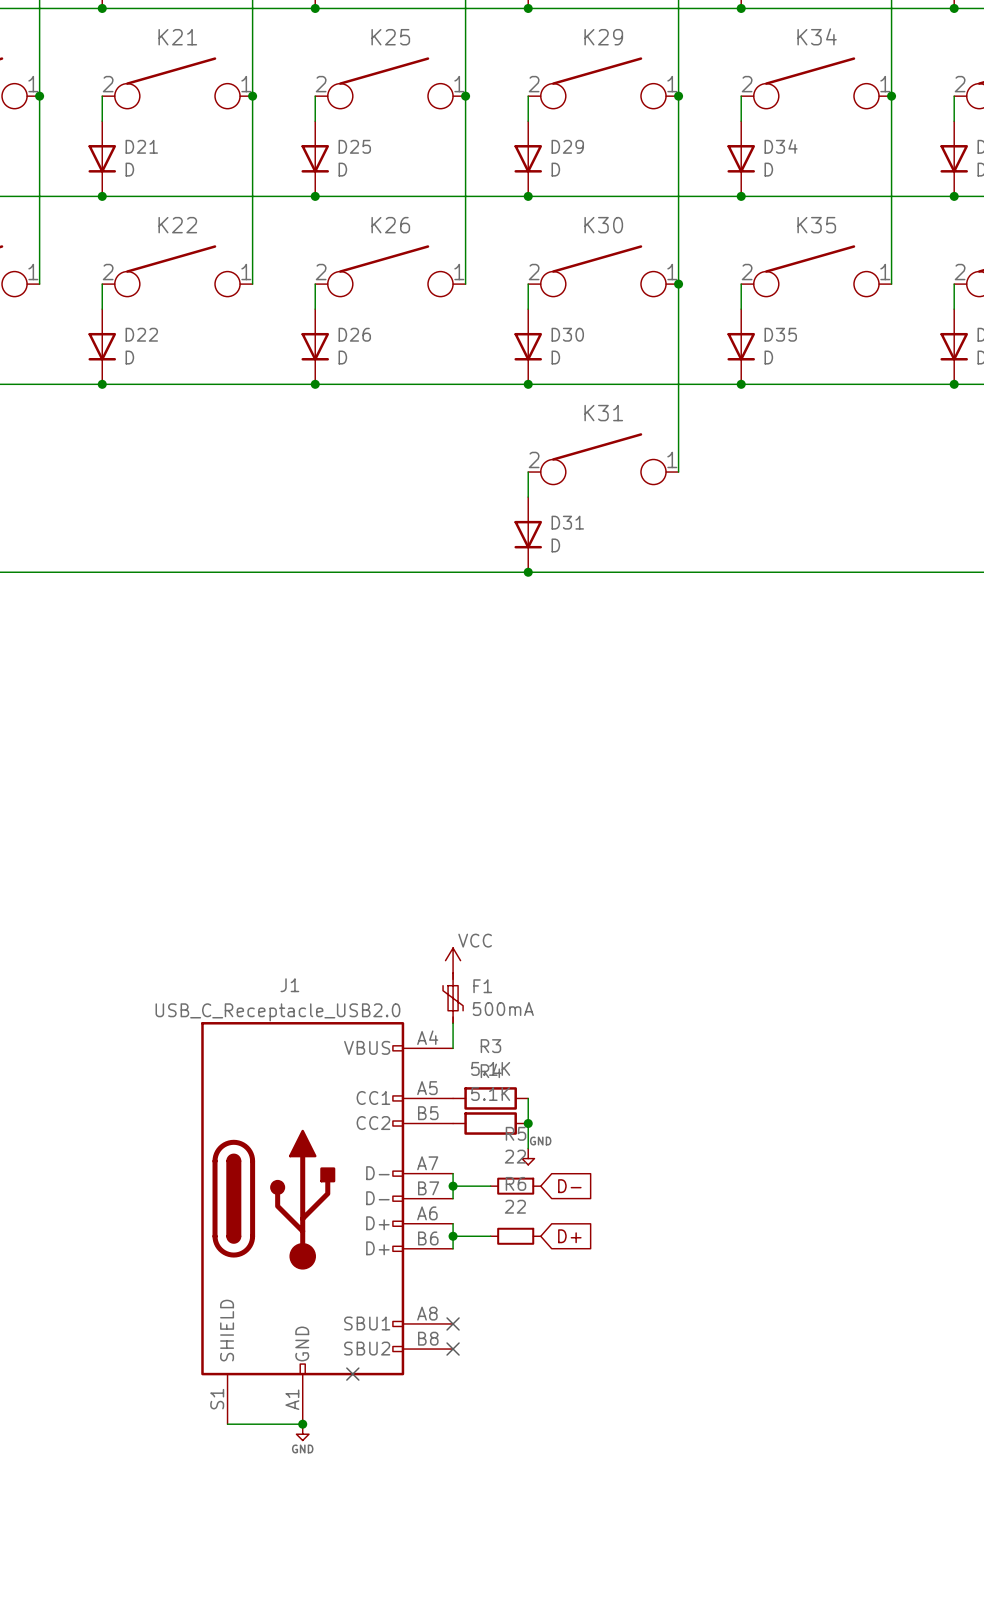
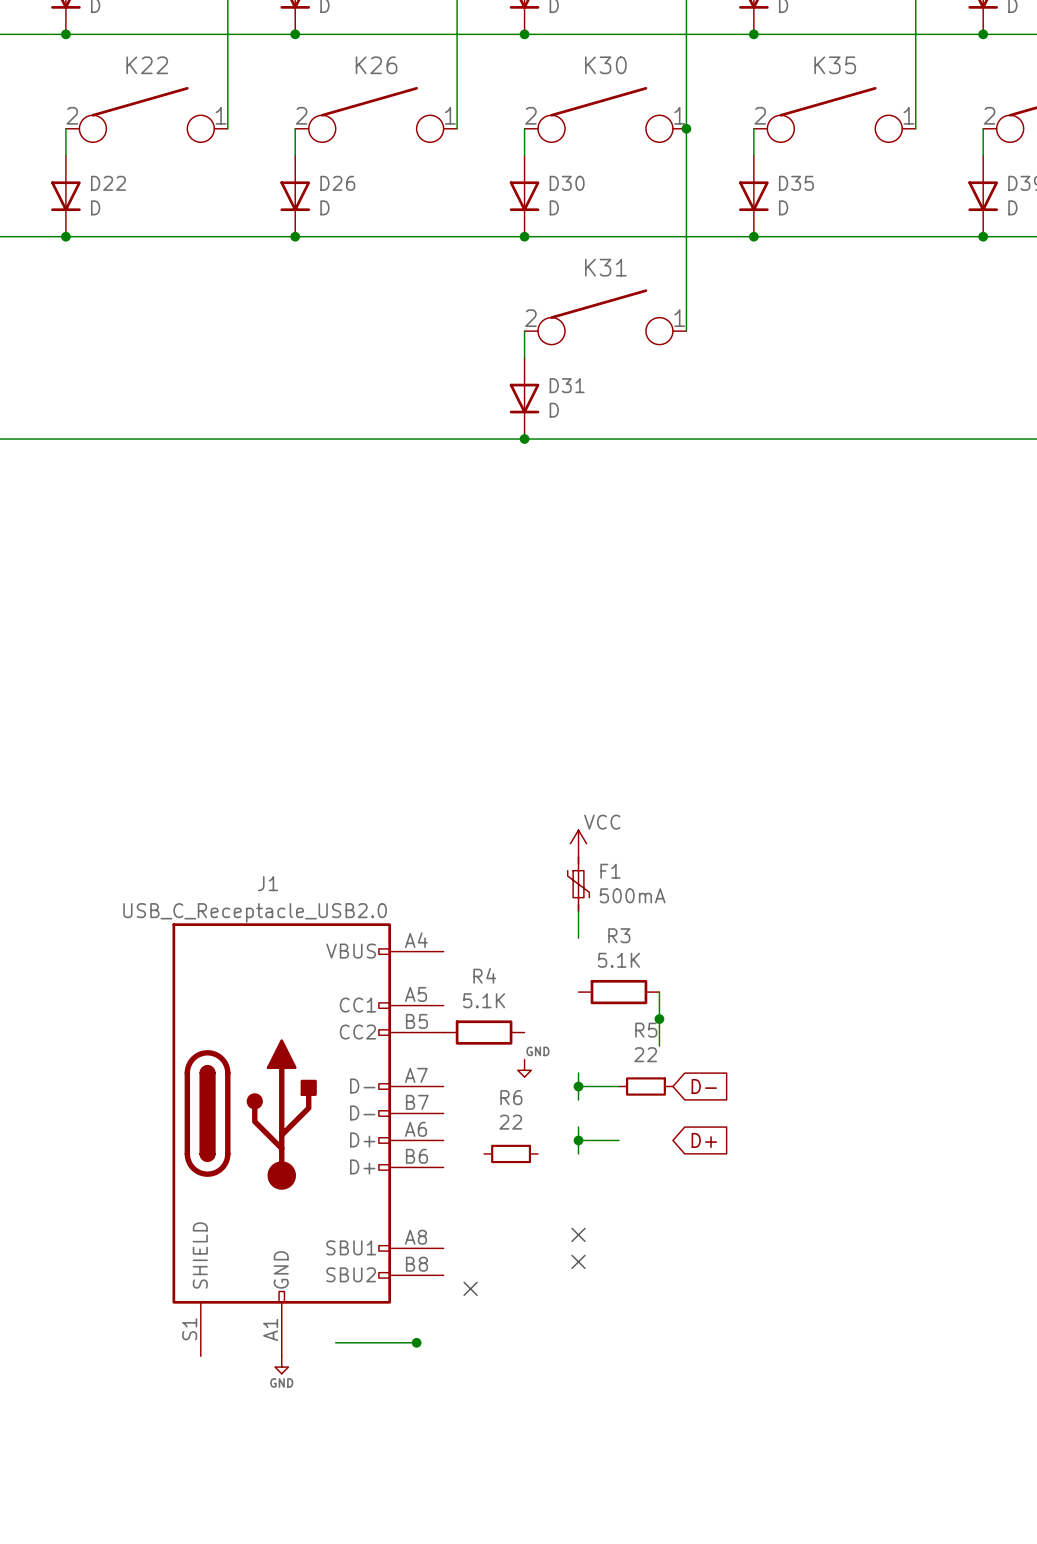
power symbol position: VCC (453, 960) -> VCC (578, 843)
F1 position: (453, 998) -> (578, 884)
wire: (453, 1023) (453, 1048) -> (578, 911) (578, 938)
R3 position: (490, 1098) -> (618, 992)
wire: (528, 1098) (528, 1148) -> (659, 992) (659, 1046)
junction: none -> (659, 1019)
junction: (528, 1123) -> none
wire: (453, 1173) (453, 1198) -> (578, 1073) (578, 1099)
junction: none -> (578, 1086)
wire: (453, 1186) (490, 1186) -> (578, 1086) (618, 1086)
junction: (453, 1186) -> none
R5 position: (515, 1186) -> (645, 1086)
global label position: D- (569, 1186) -> D- (704, 1086)
wire: (453, 1223) (453, 1248) -> (578, 1126) (578, 1153)
junction: none -> (578, 1140)
wire: (453, 1236) (490, 1236) -> (578, 1140) (618, 1140)
junction: (453, 1236) -> none
global label position: D+ (569, 1236) -> D+ (704, 1140)
no-connect mark: none -> (578, 1234)
no-connect mark: (453, 1323) -> none
no-connect mark: none -> (578, 1261)
no-connect mark: (453, 1349) -> none
no-connect mark: none -> (470, 1288)
no-connect mark: (352, 1374) -> none
junction: none -> (416, 1342)
wire: (227, 1424) (302, 1424) -> (335, 1342) (416, 1342)
junction: (302, 1424) -> none

